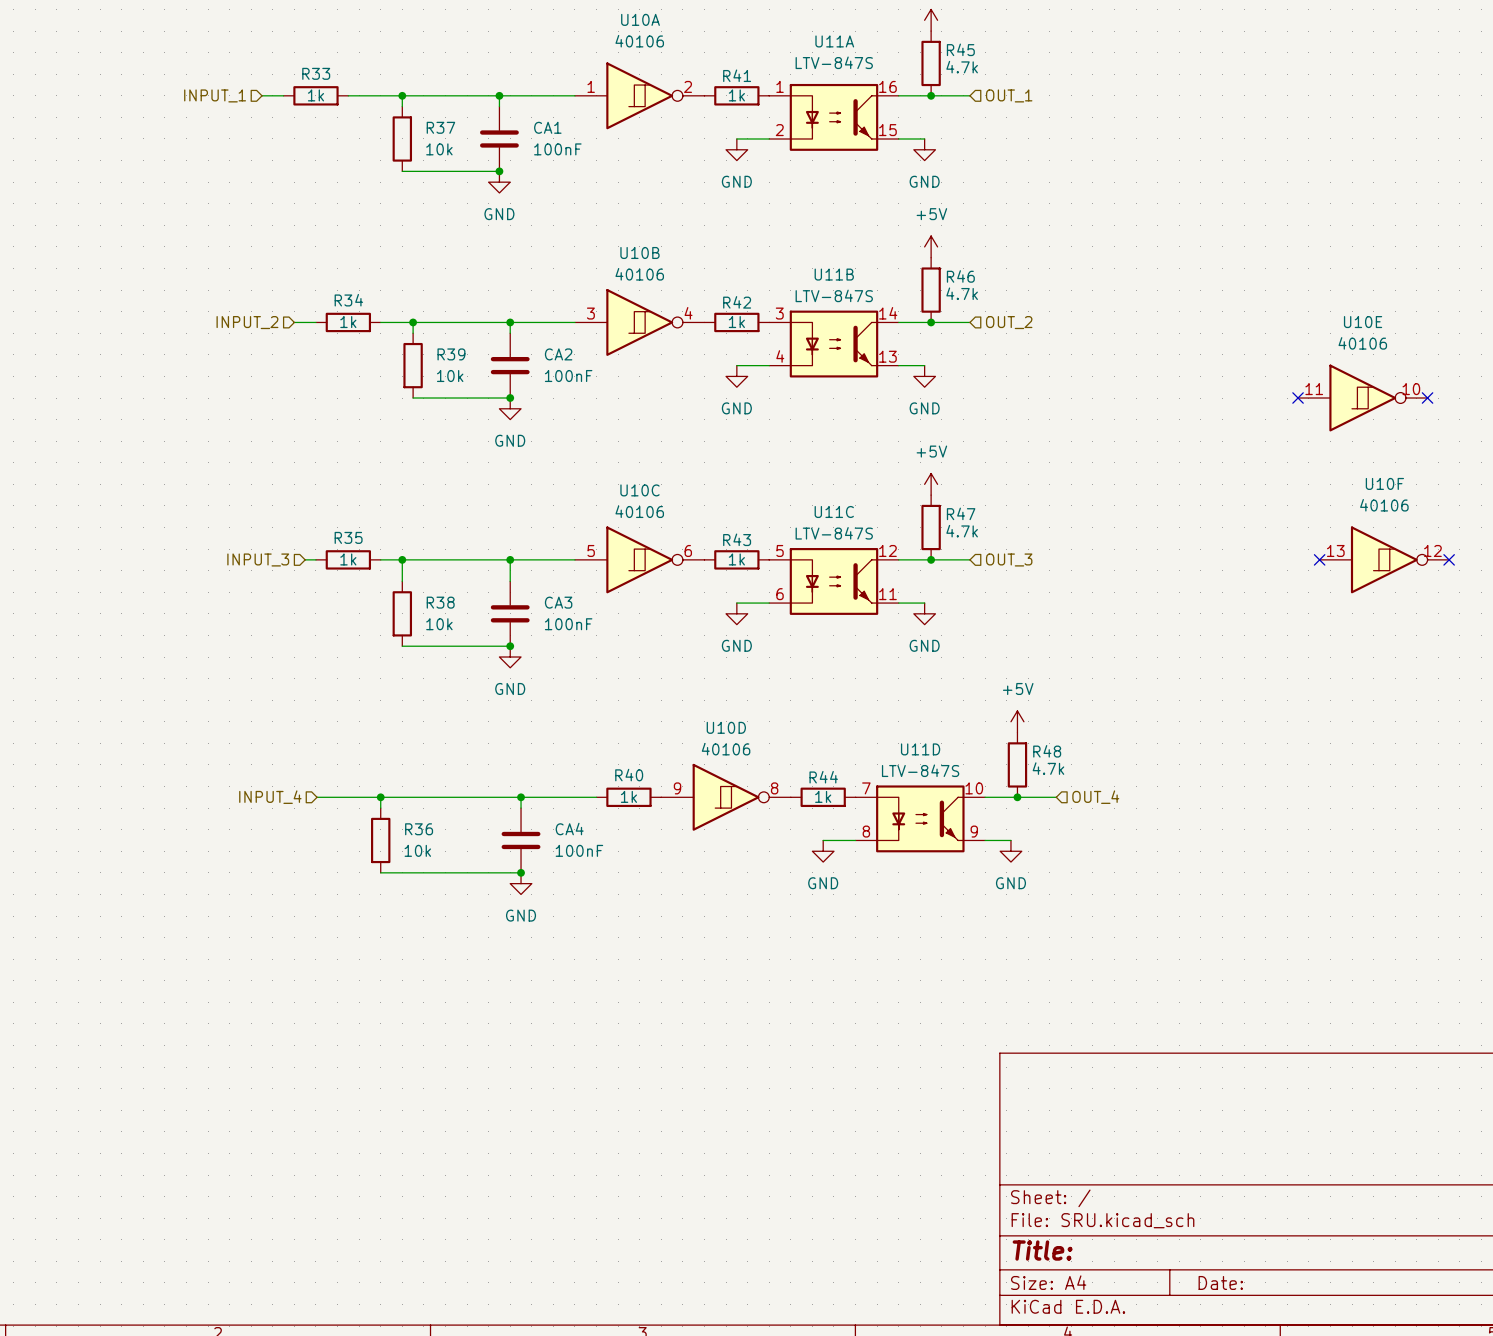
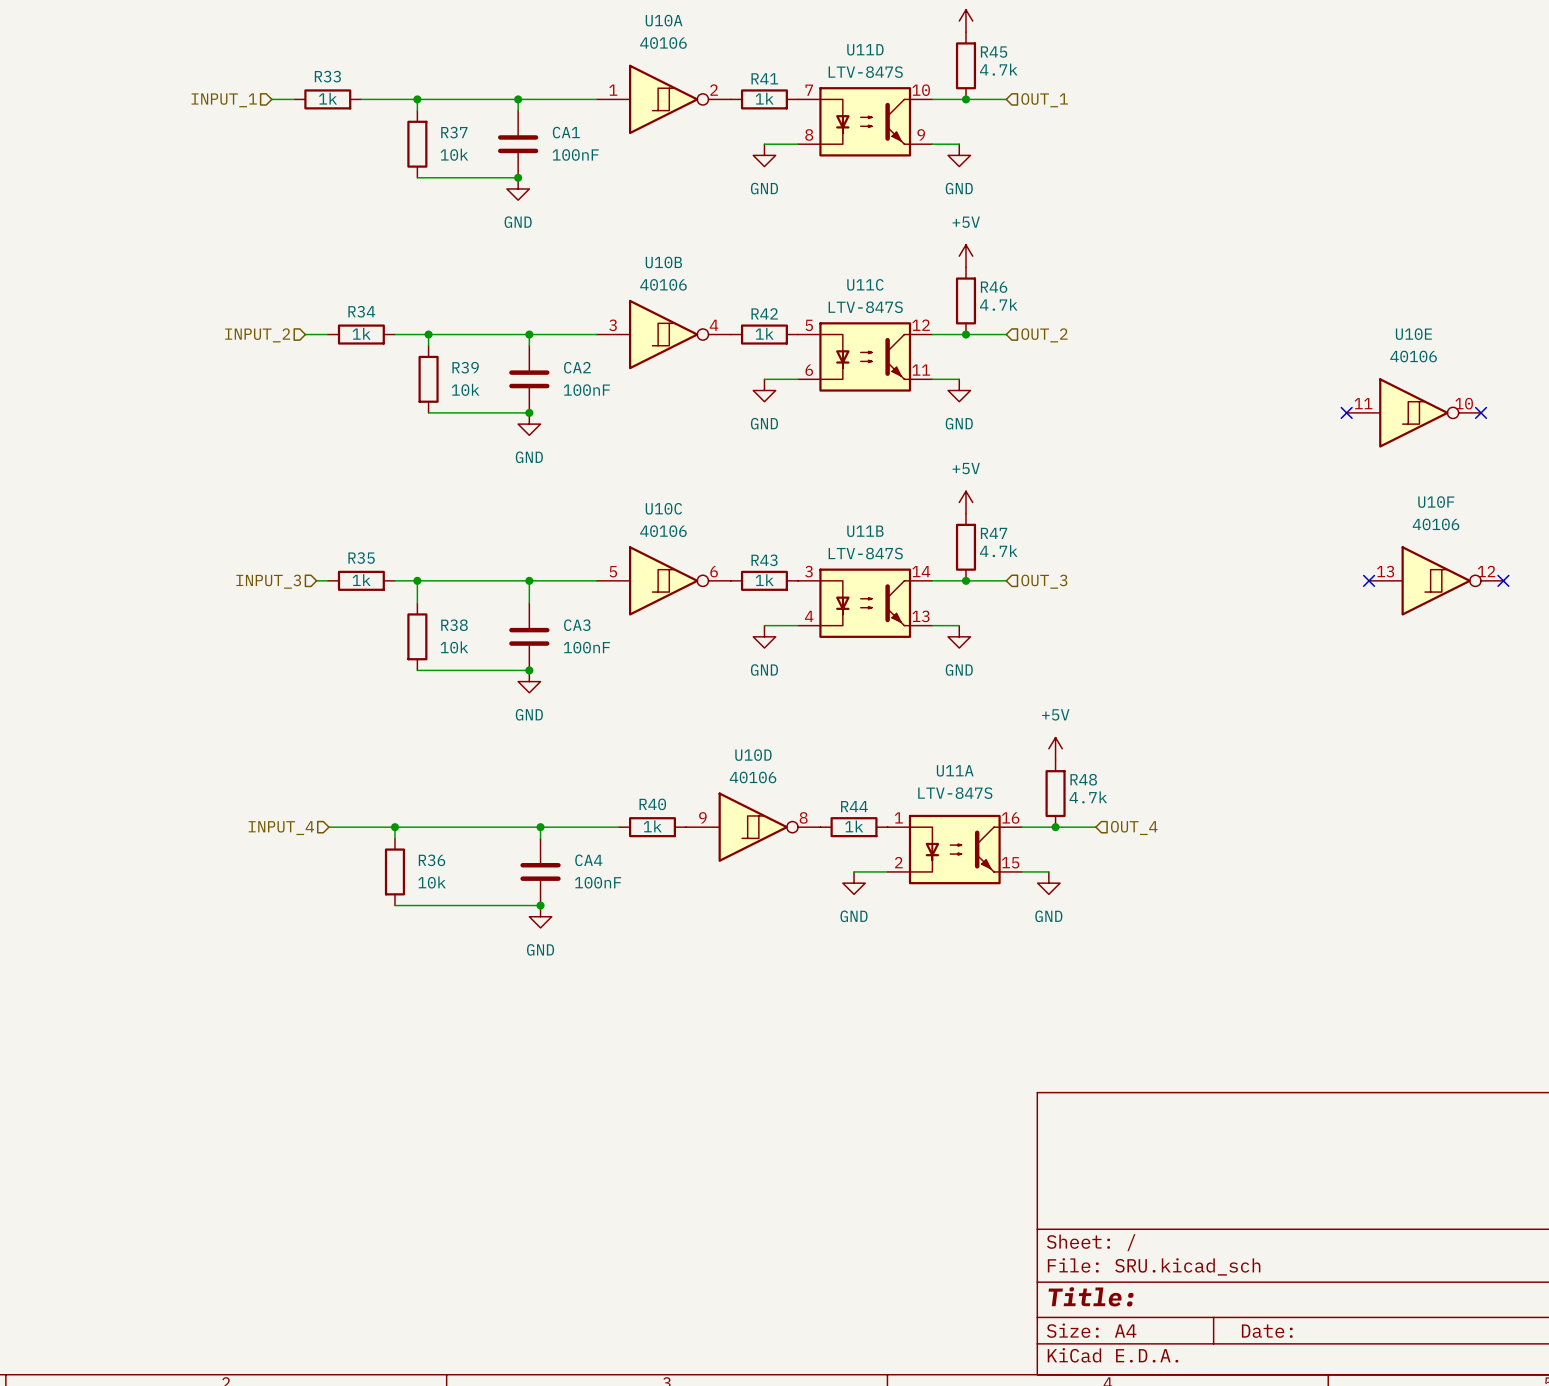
U11A position: (833, 117) -> (954, 849)
U11B position: (833, 344) -> (865, 603)
U11C position: (833, 581) -> (865, 356)
U11D position: (920, 818) -> (865, 121)

